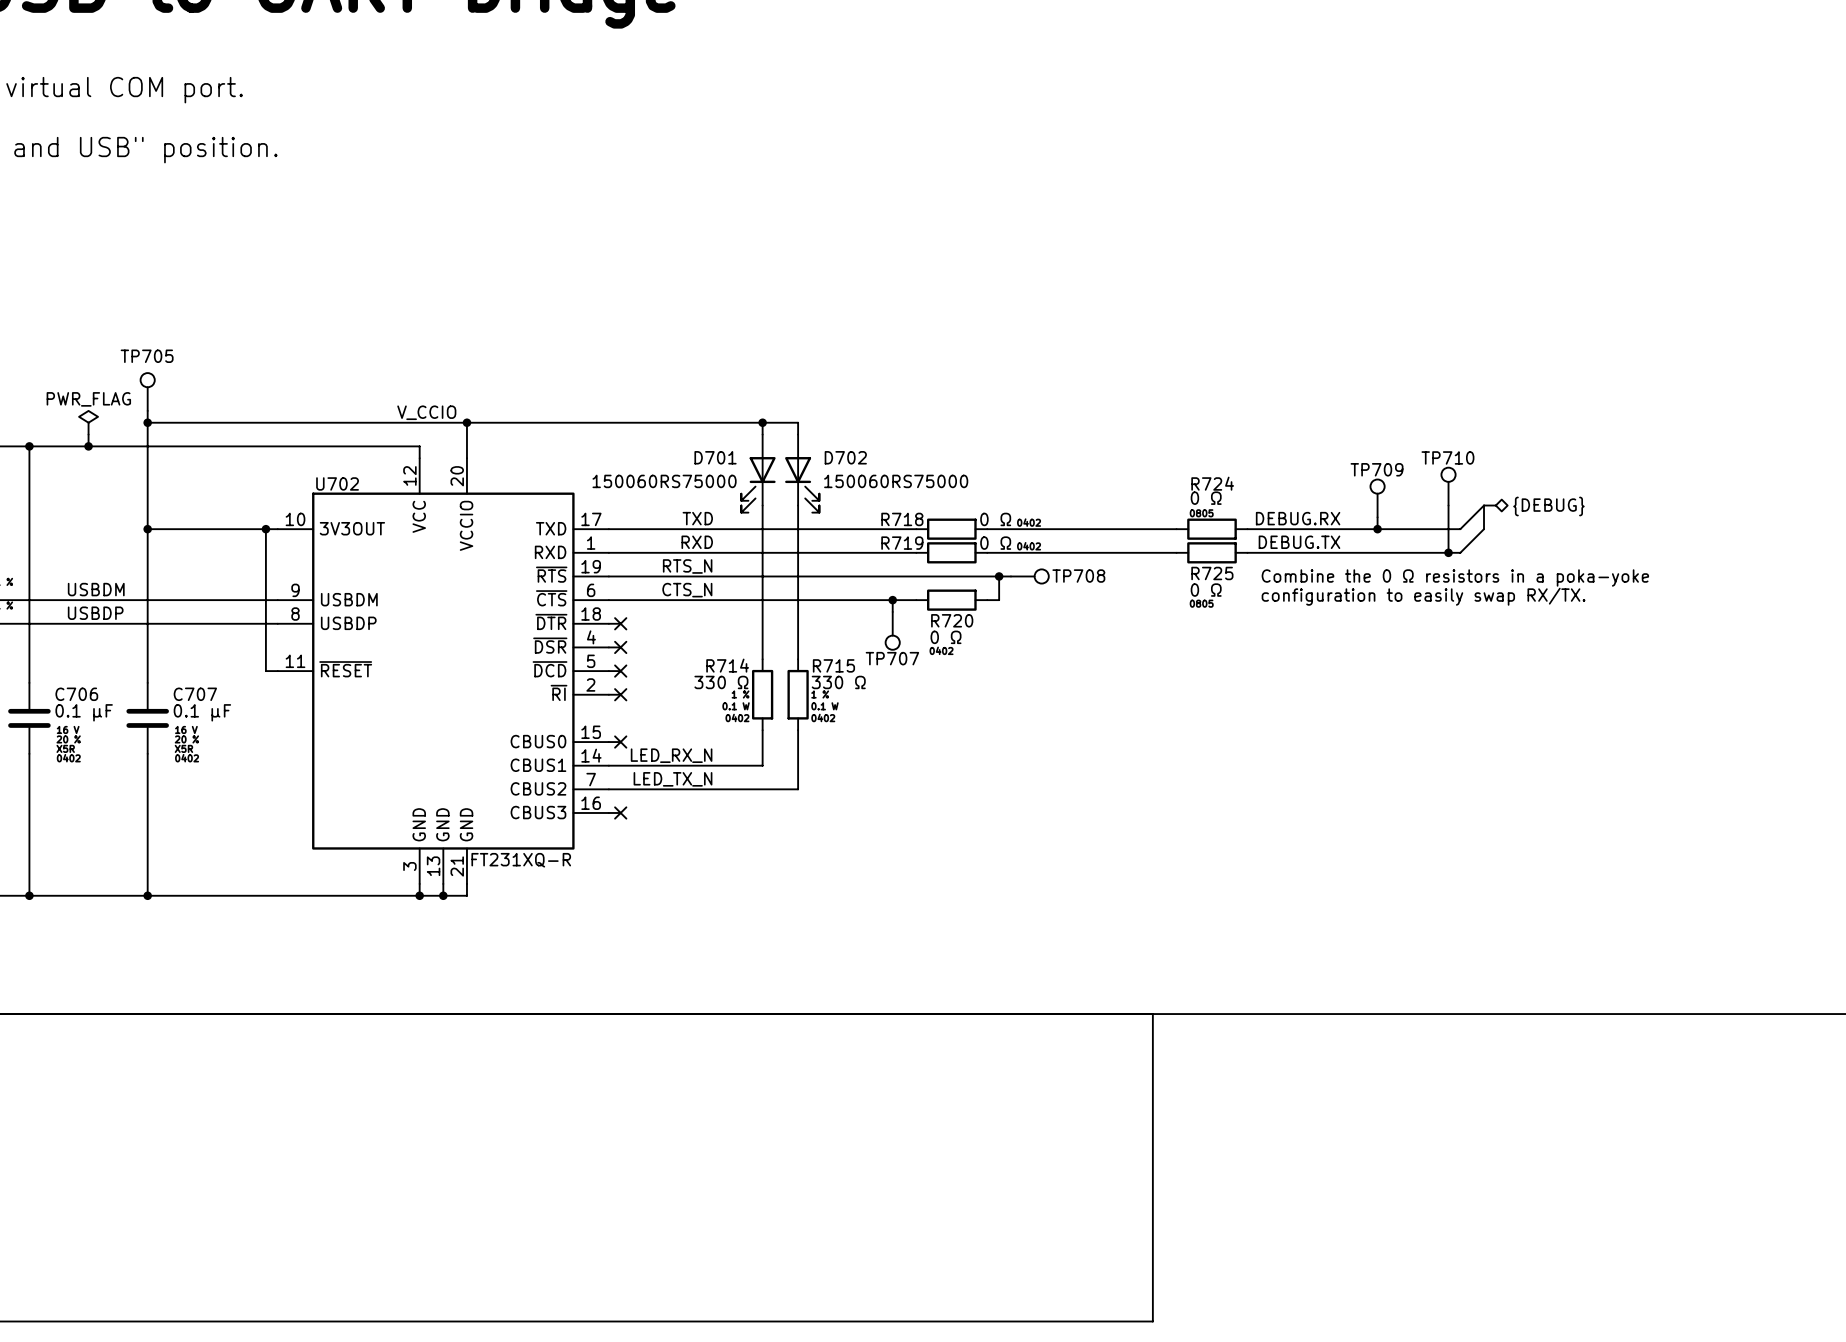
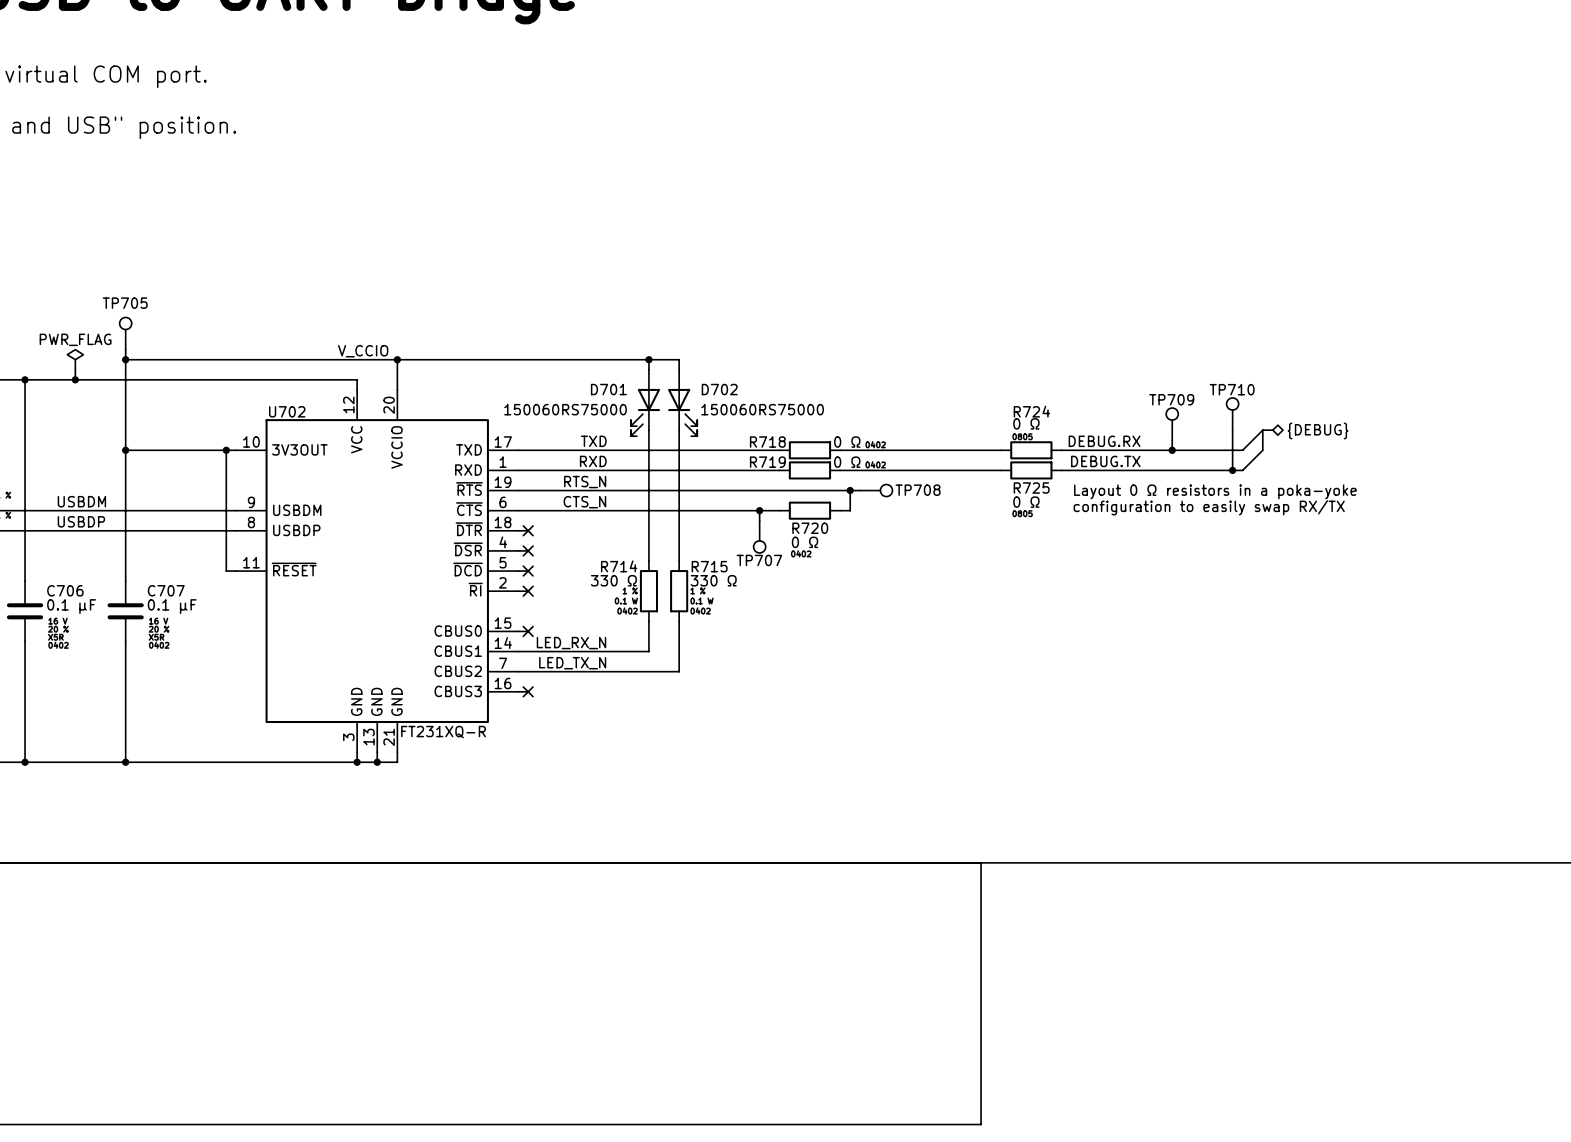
text: Combine the 0 Ω resistors in a poka-yoke (1455, 577) -> Layout 0 Ω resistors in a poka-yoke (1215, 491)
text: configuration to easily swap RX/TX. (1423, 596) -> configuration to easily swap RX/TX (1209, 507)

